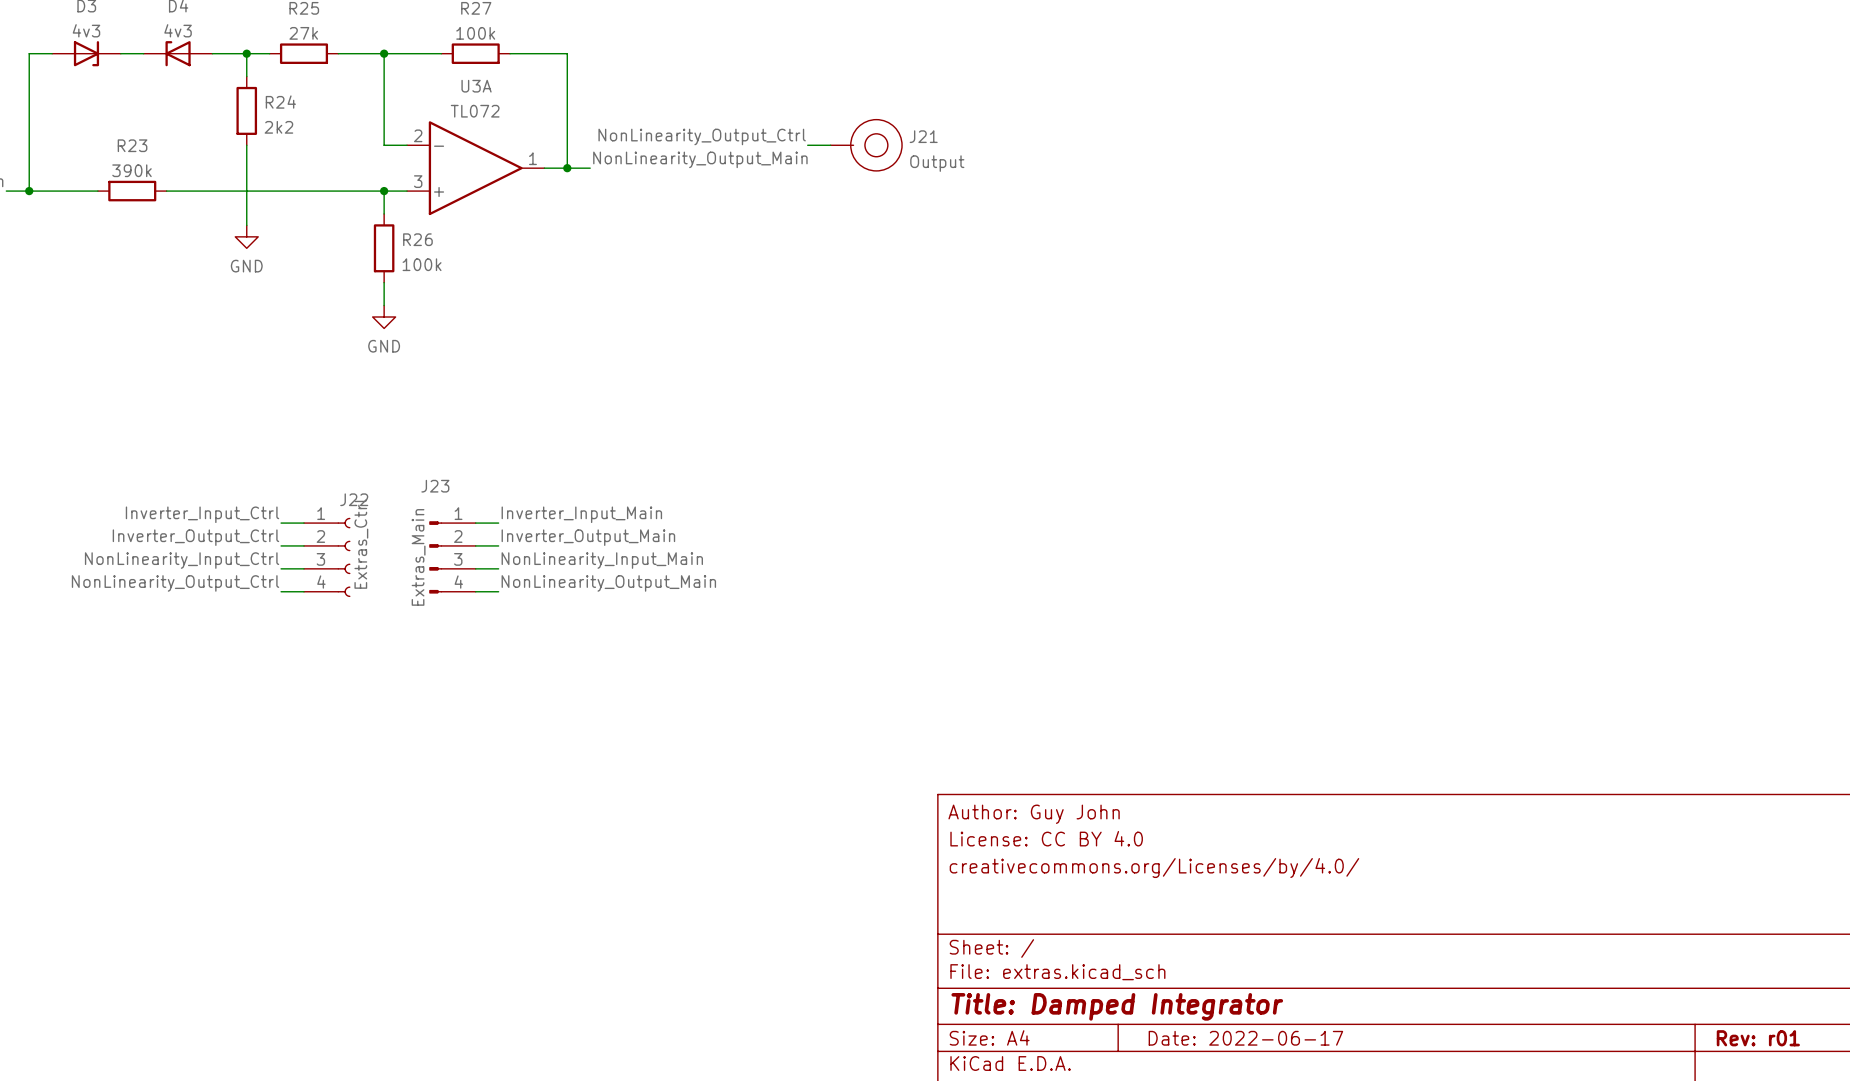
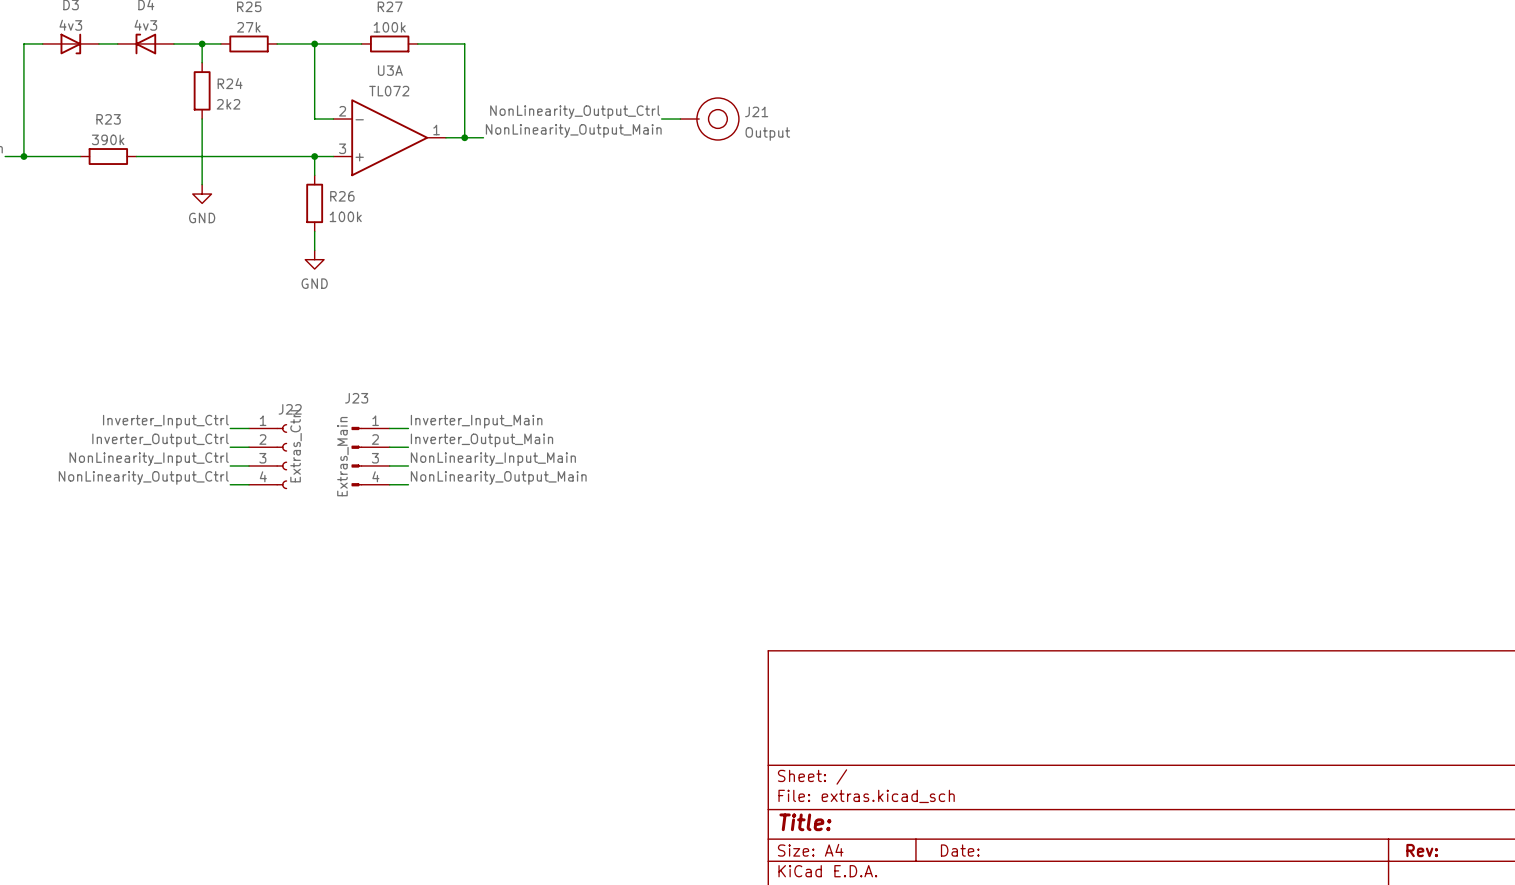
title block: Author: Guy John (1034, 814) -> none
title block: License: CC BY 4.0 (1046, 838) -> none
title block: creativecommons.org/Licenses/by/4.0/ (1154, 868) -> none
title block: Title: Damped Integrator (1117, 1006) -> Title: (805, 822)
title block: Date: 2022-06-17 (1245, 1038) -> Date: (960, 850)
title block: Rev: r01 (1758, 1038) -> Rev: (1422, 850)

